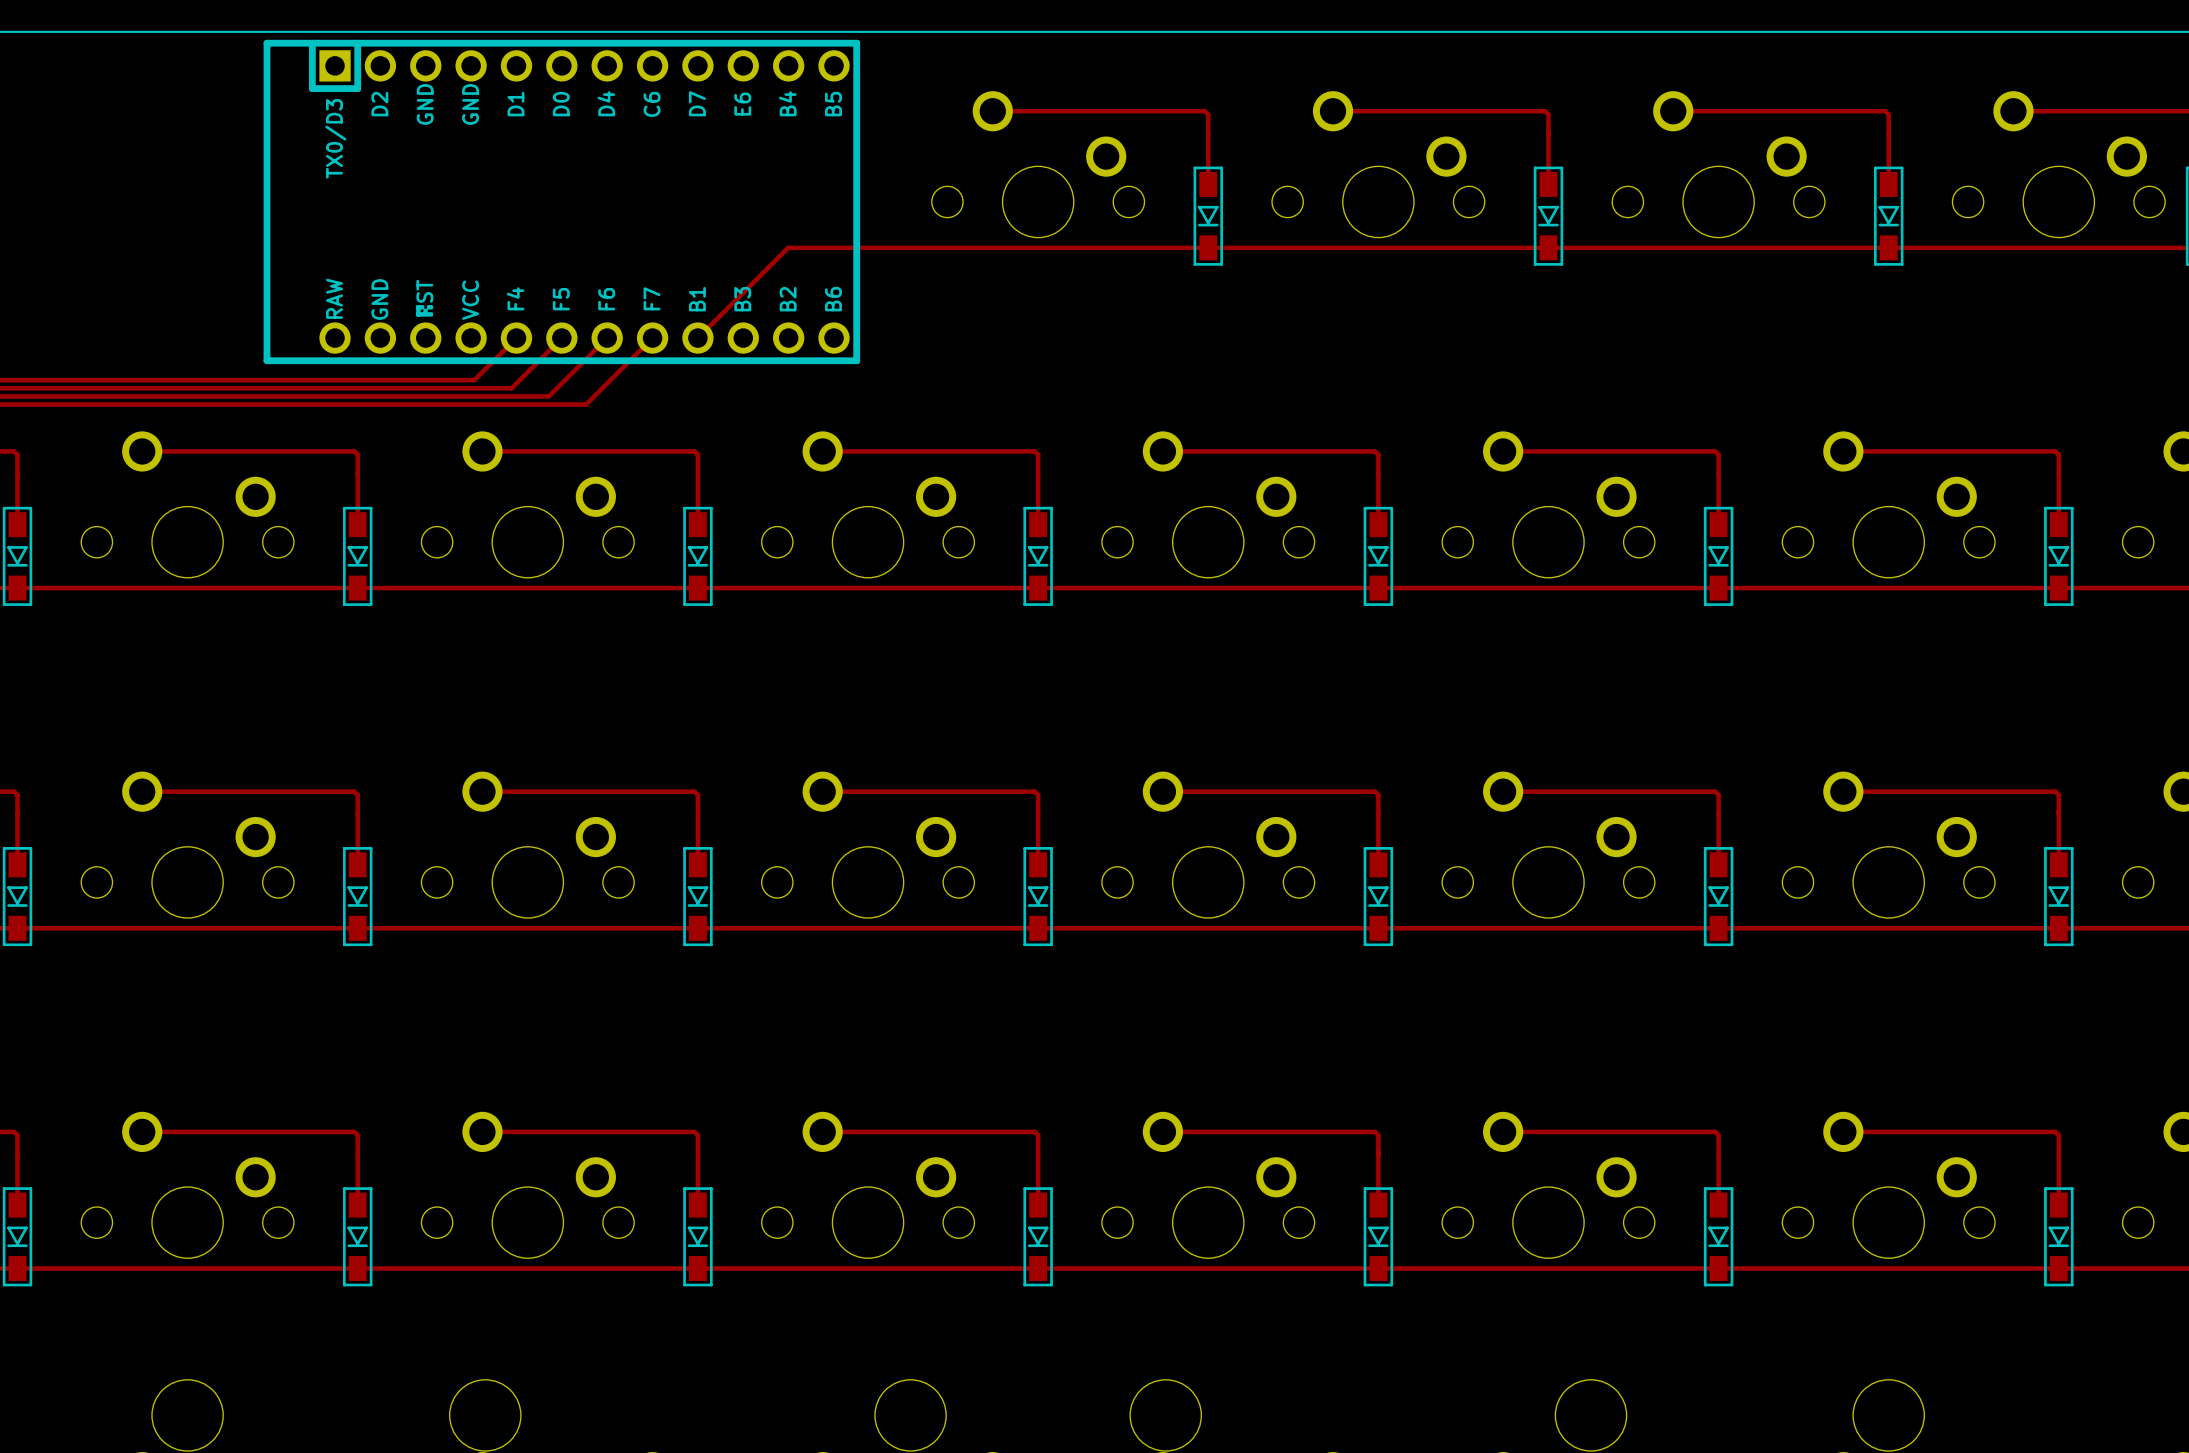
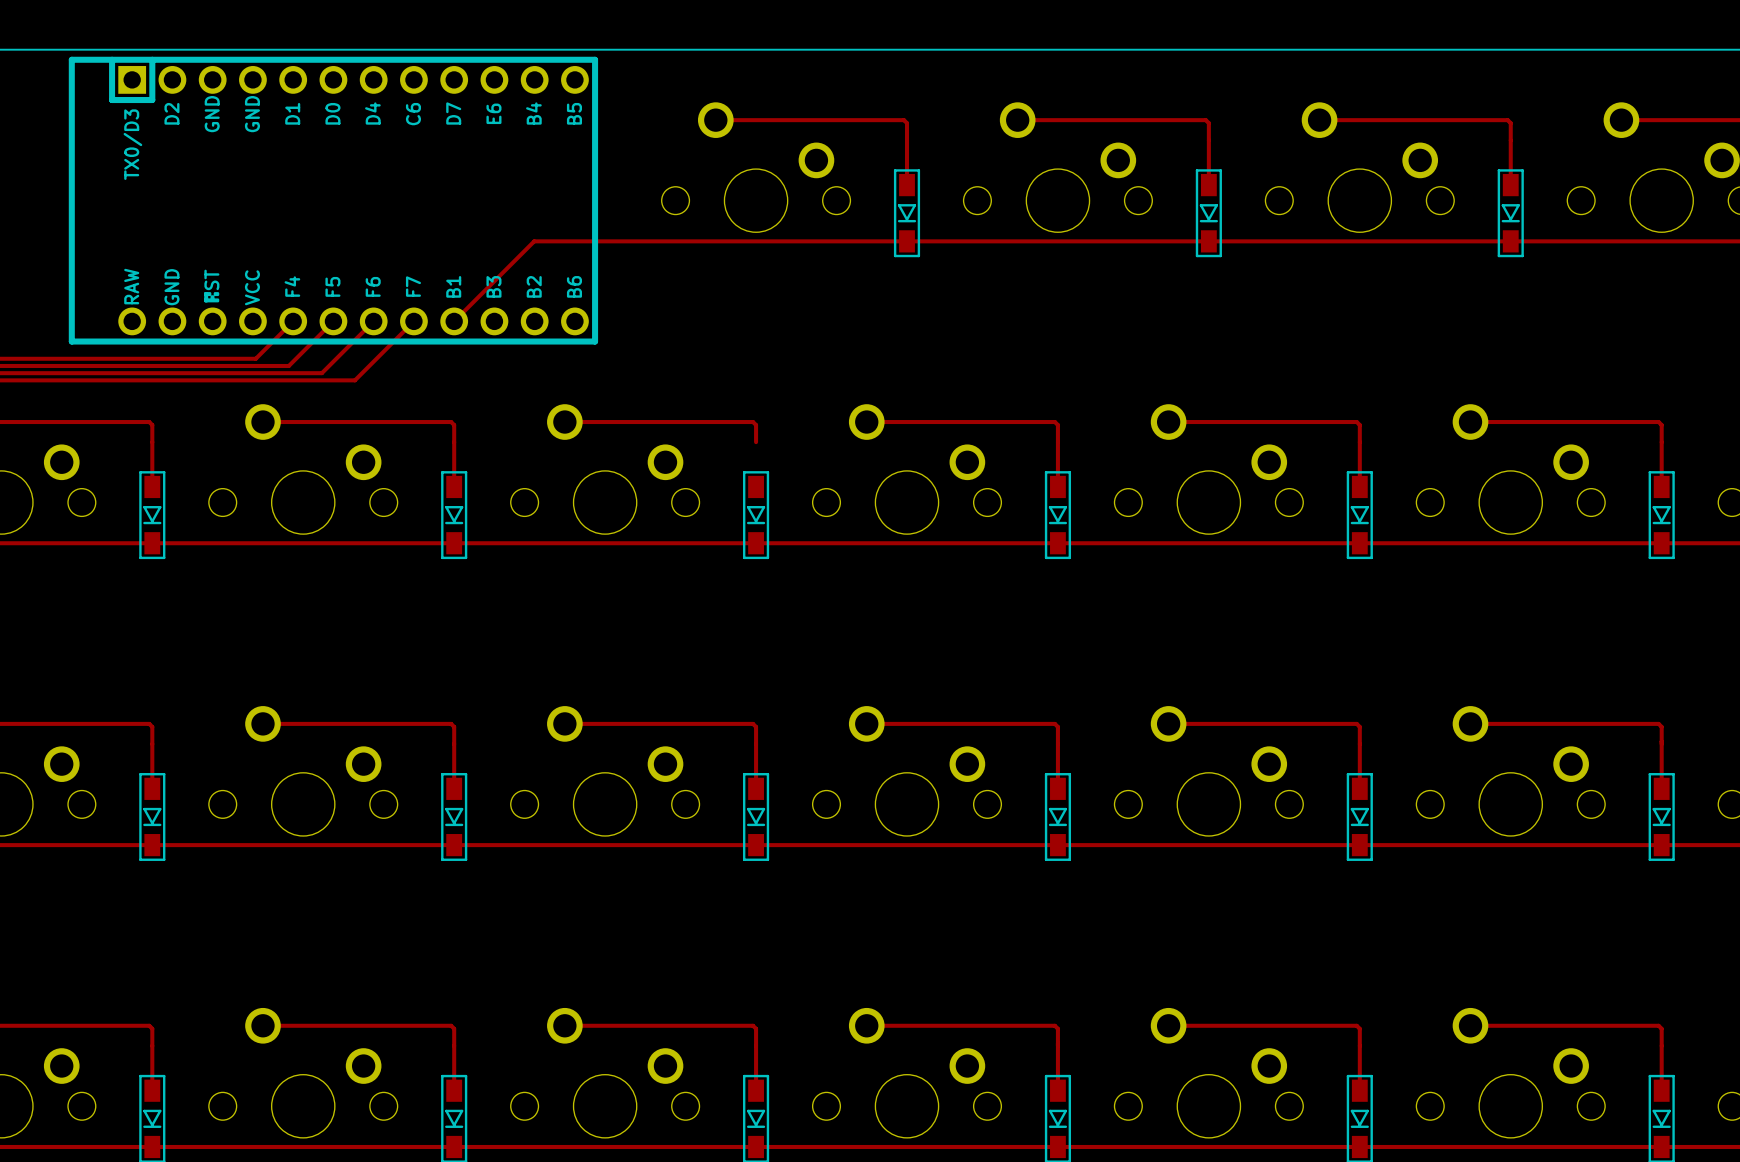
track: (1038, 474) (1038, 524) -> none

